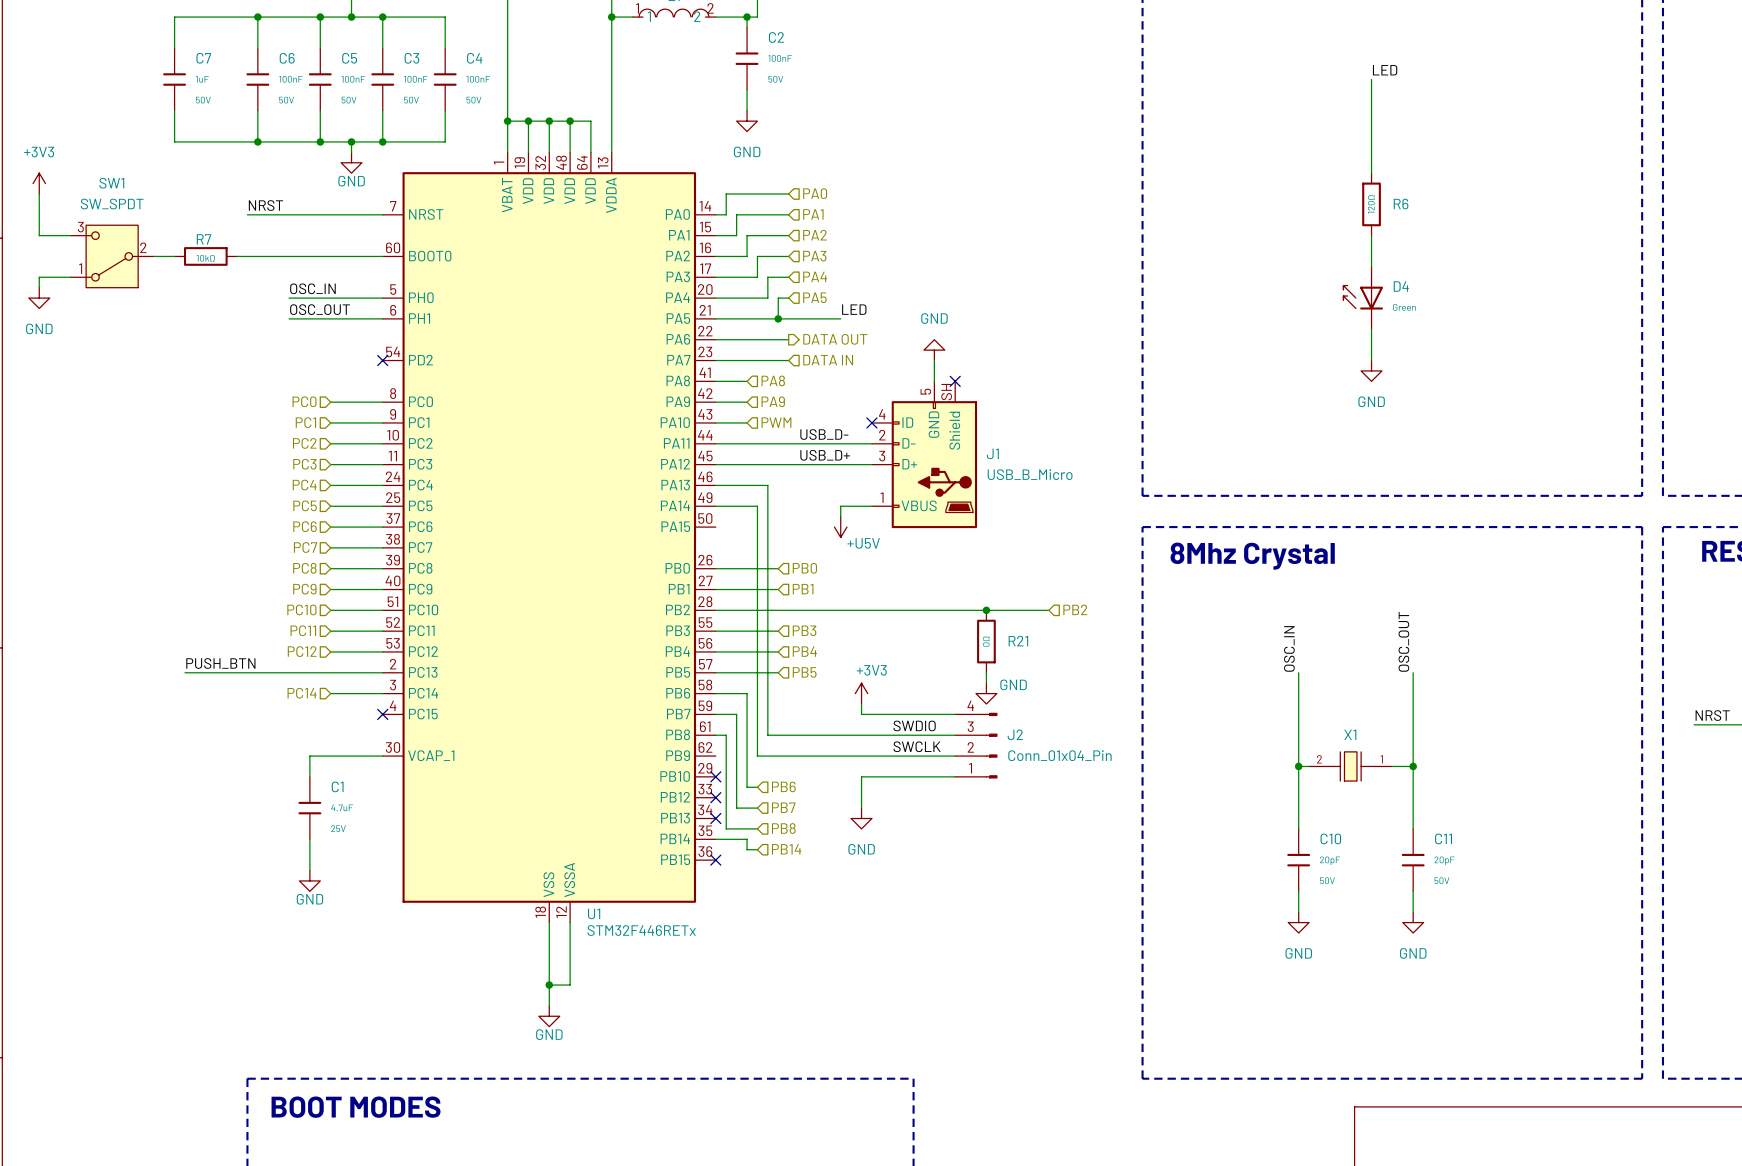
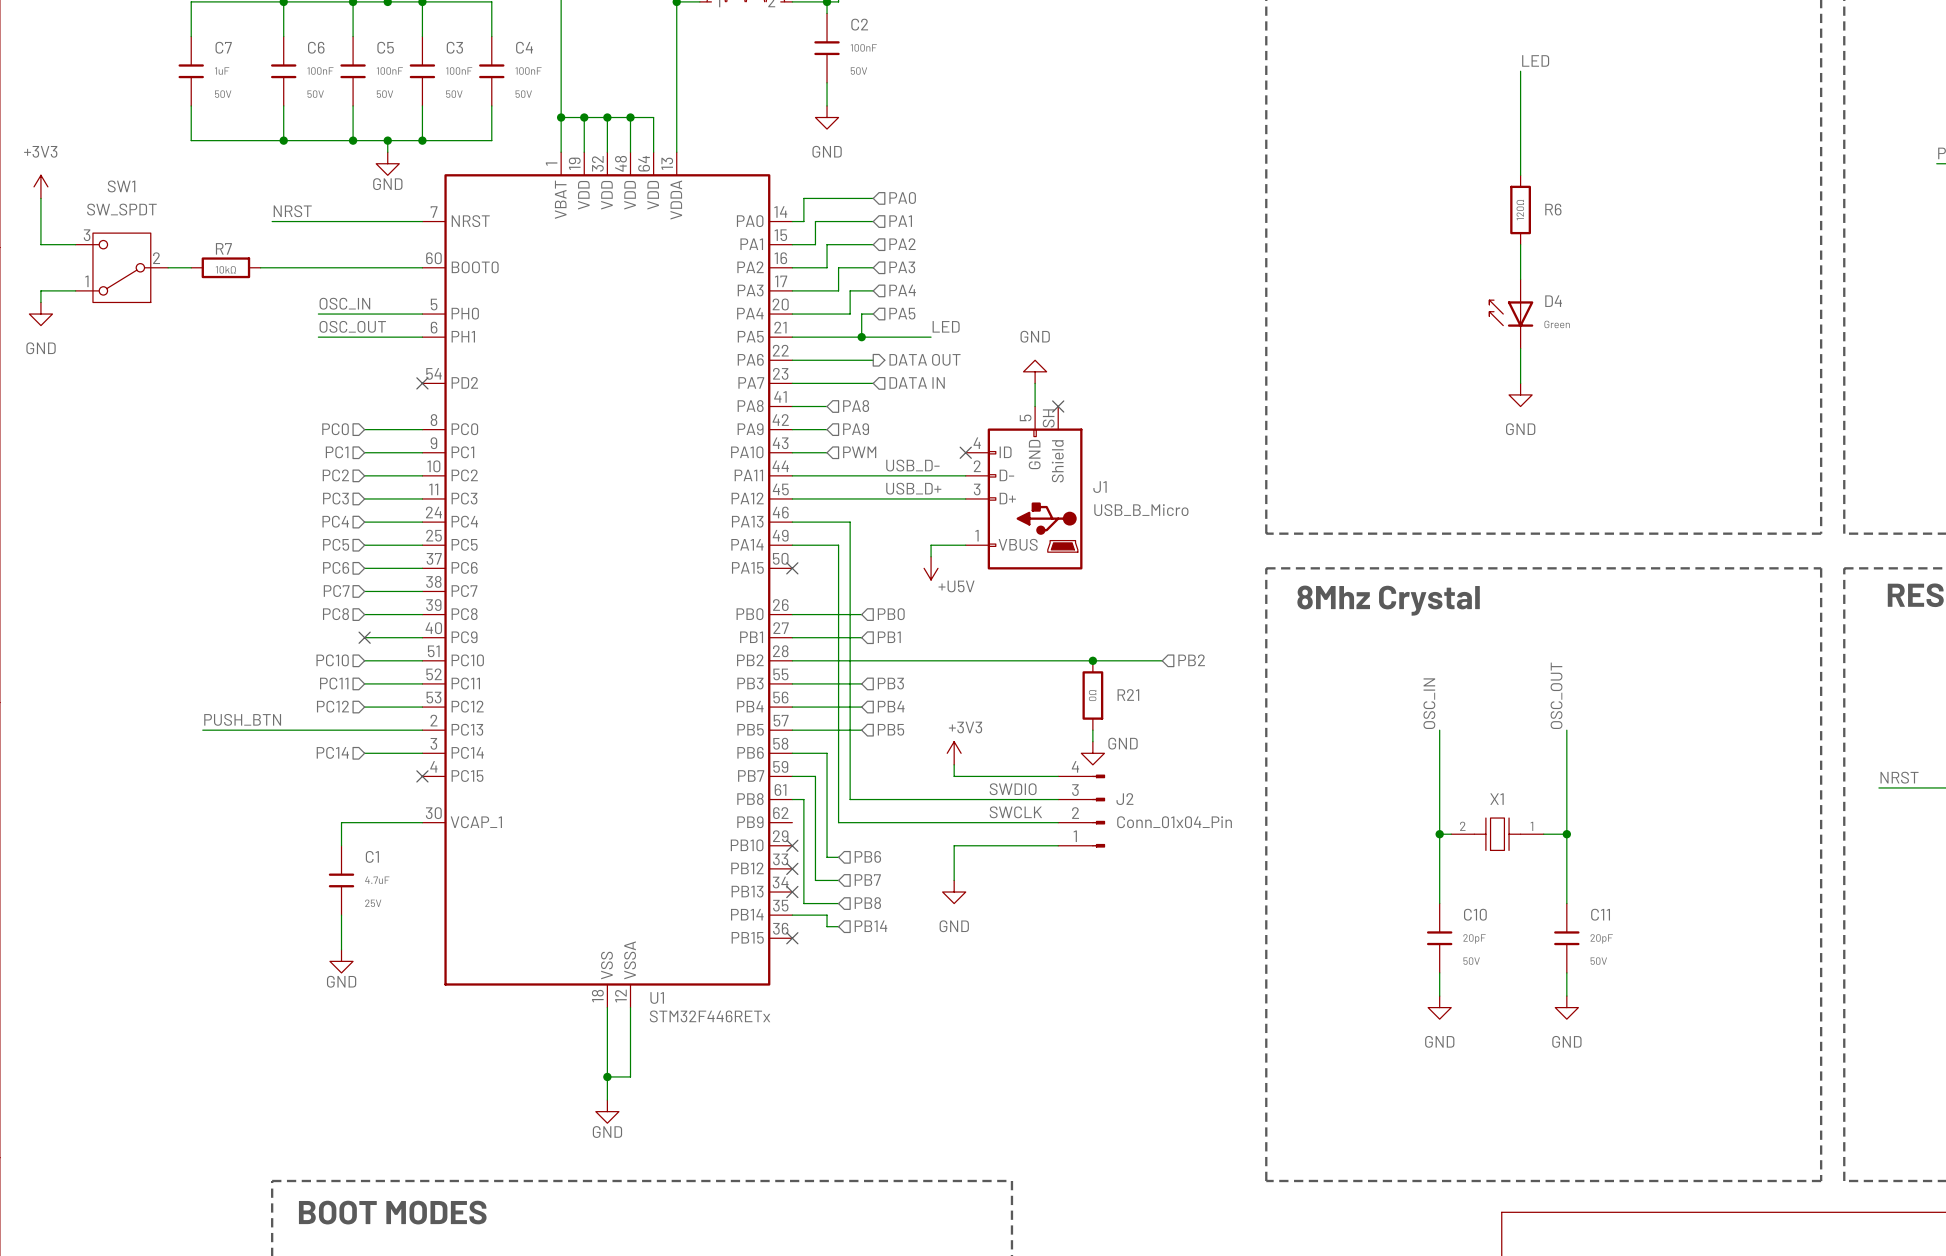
no-connect mark: none -> (792, 568)
hierarchical label: PC9 (304, 589) -> none
no-connect mark: none -> (364, 637)

